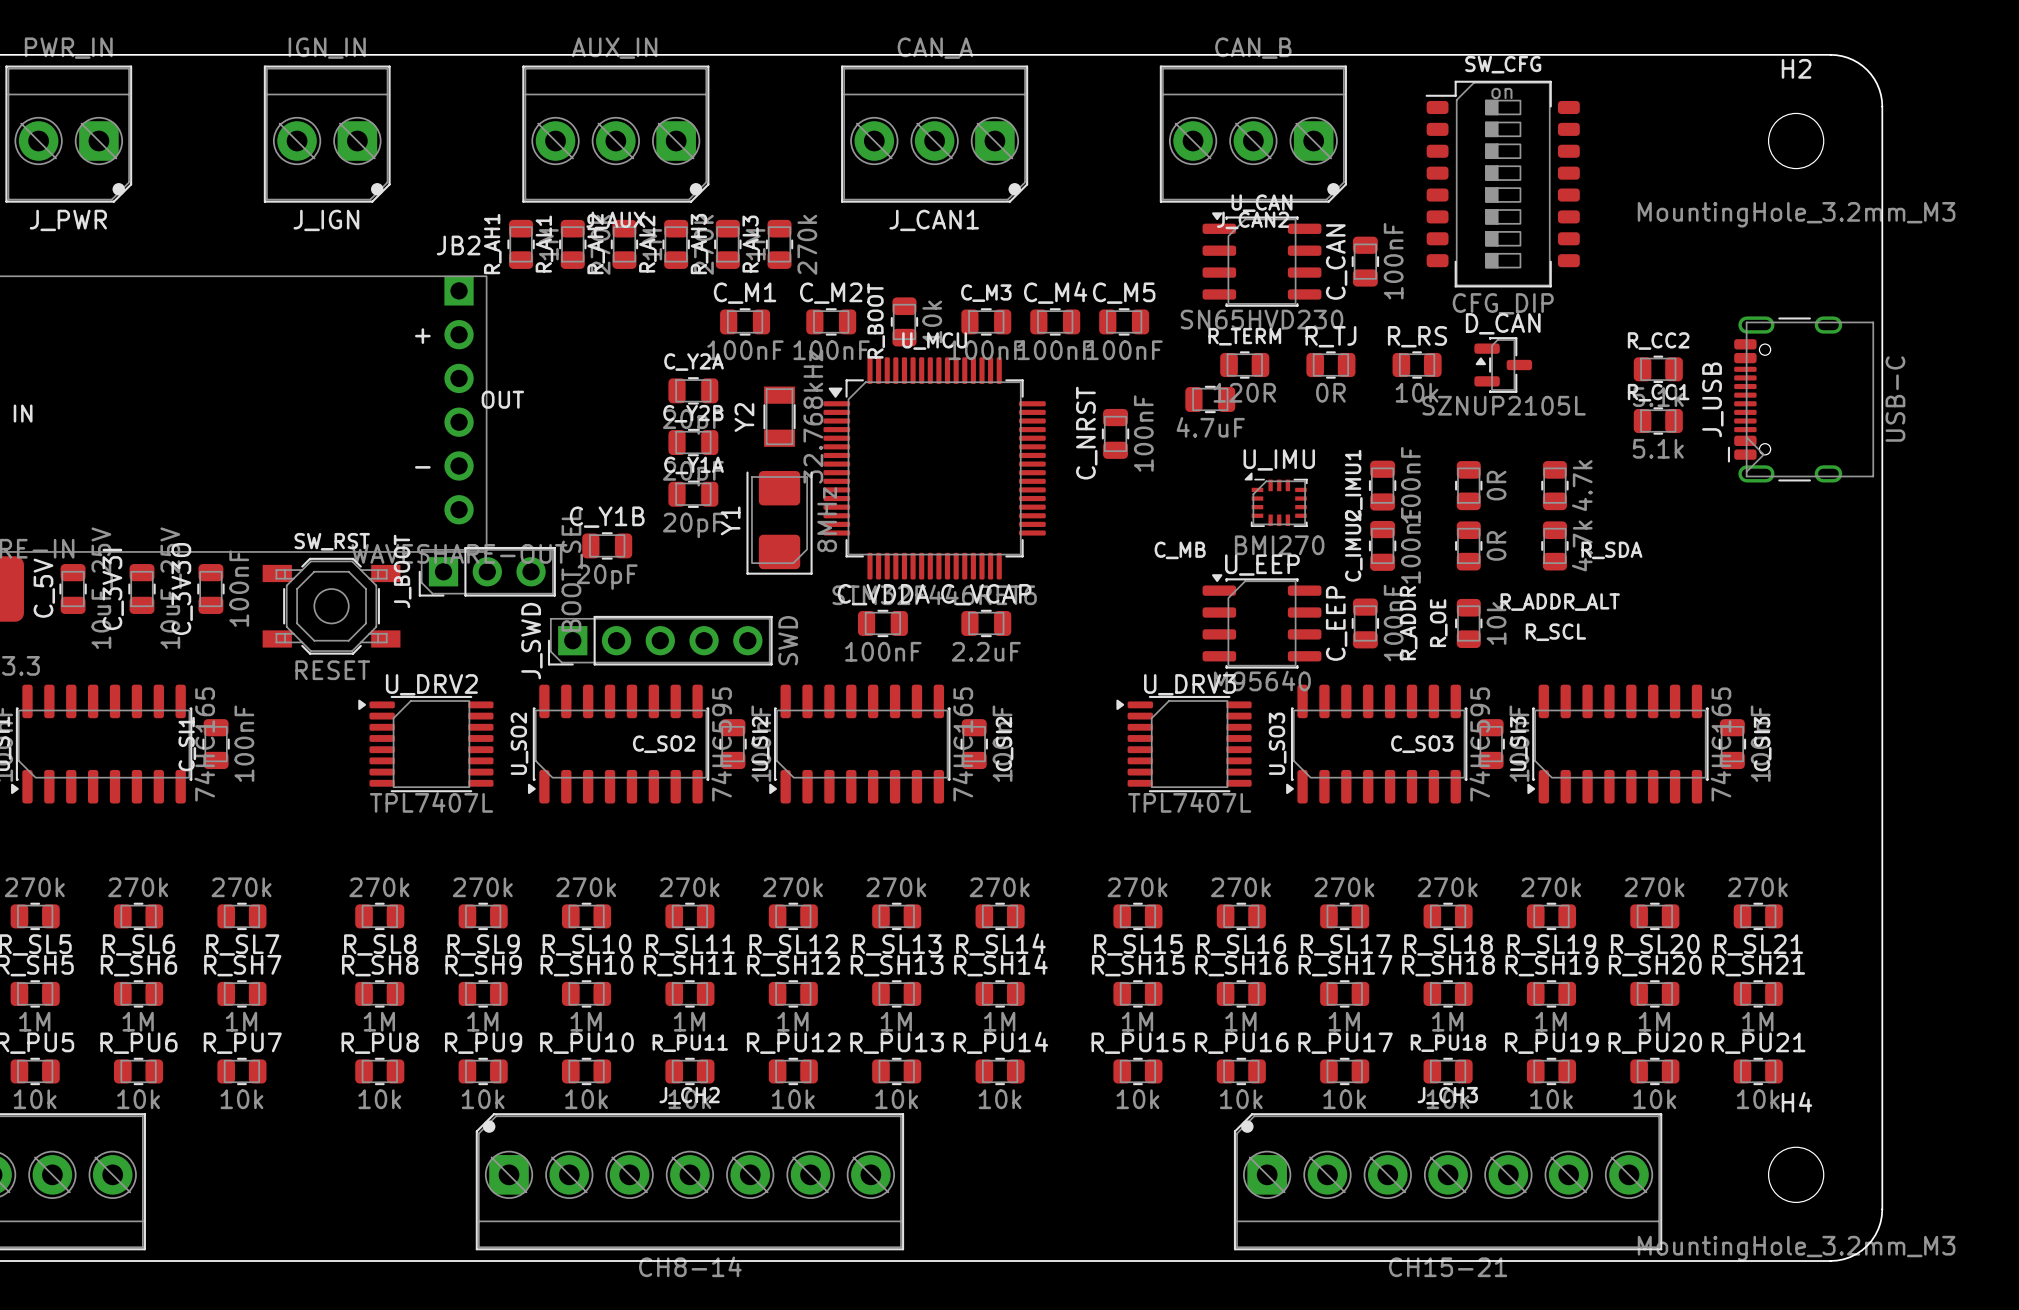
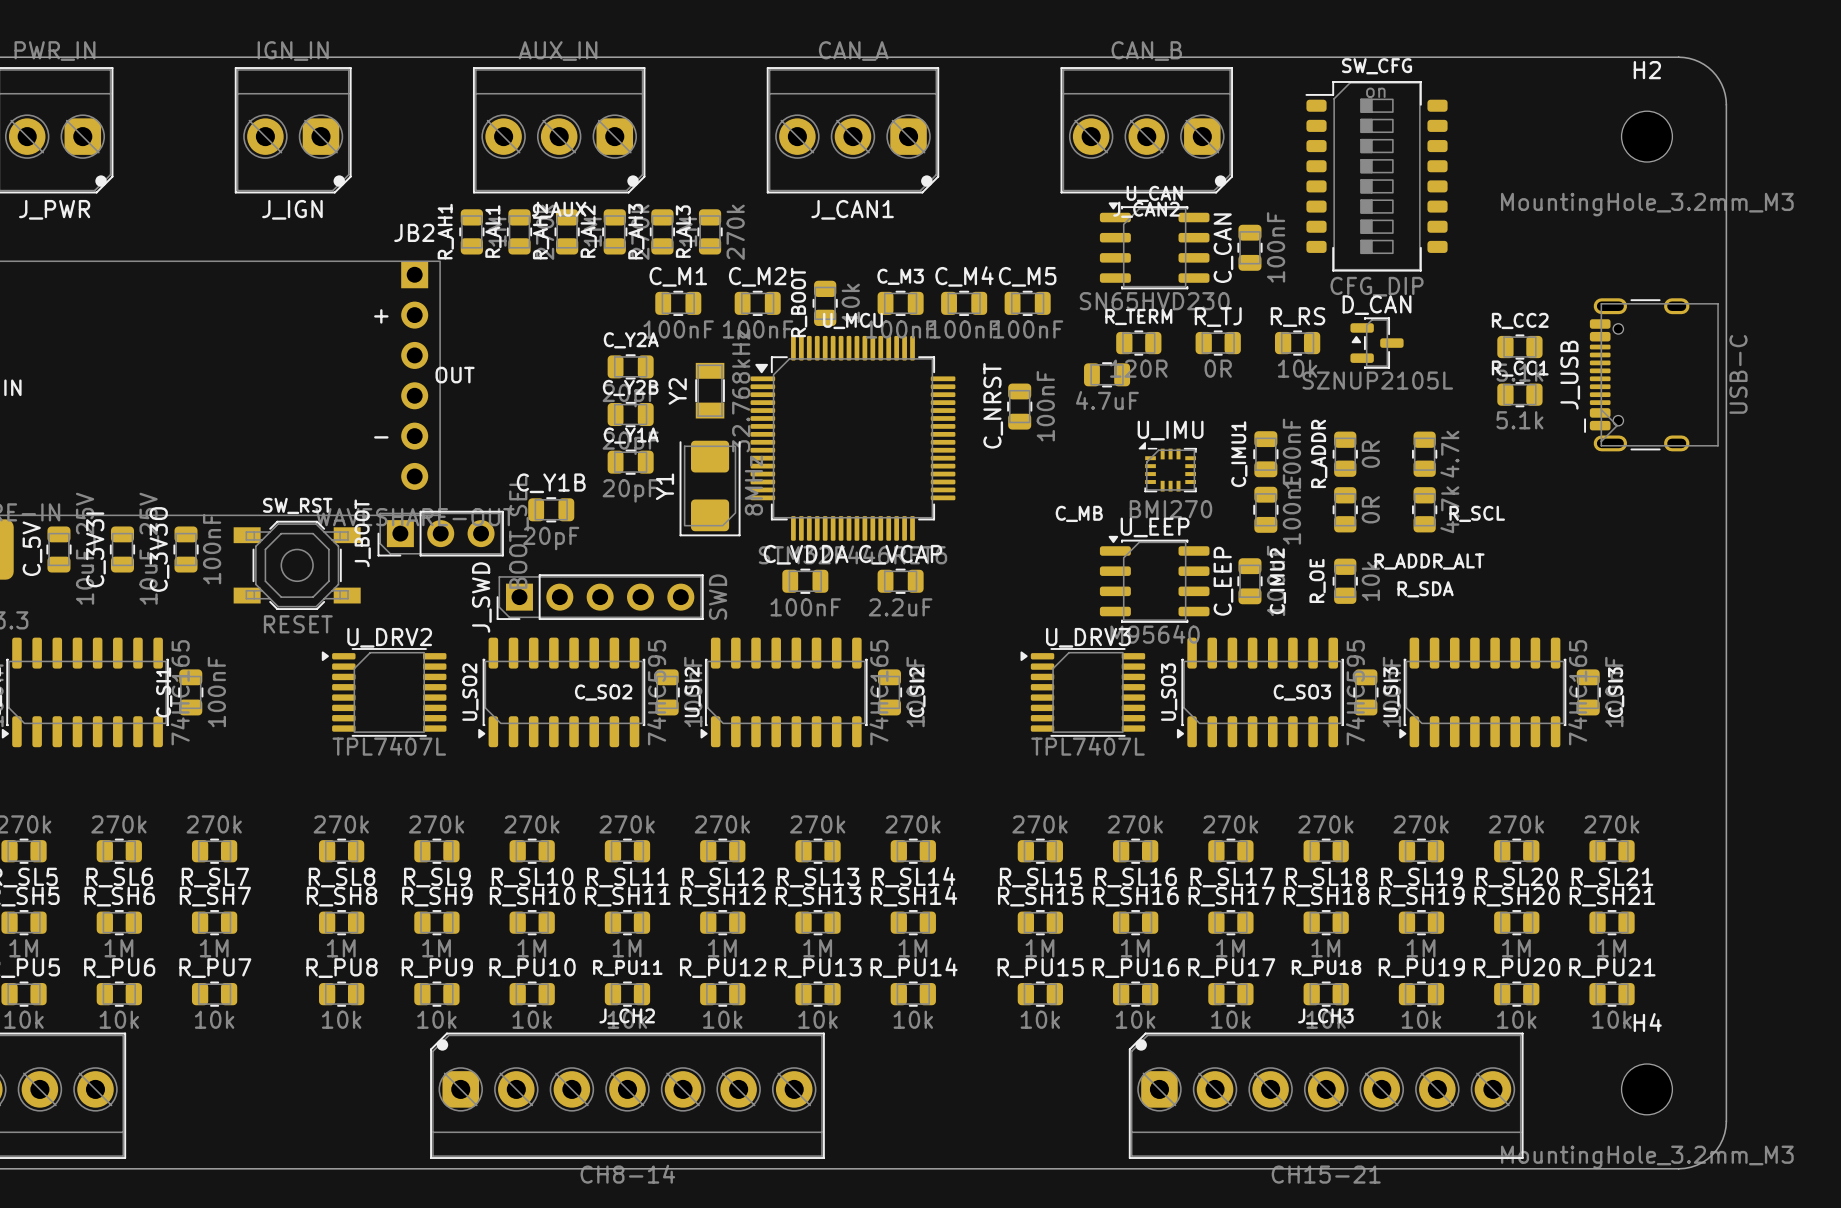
C_IMU2 name position: C_IMU2 (1353, 545) -> C_IMU2 (1277, 581)
R_SDA name position: R_SDA (1611, 550) -> R_SDA (1425, 589)
R_ADDR name position: R_ADDR (1408, 623) -> R_ADDR (1319, 453)
R_SCL name position: R_SCL (1555, 632) -> R_SCL (1477, 513)

